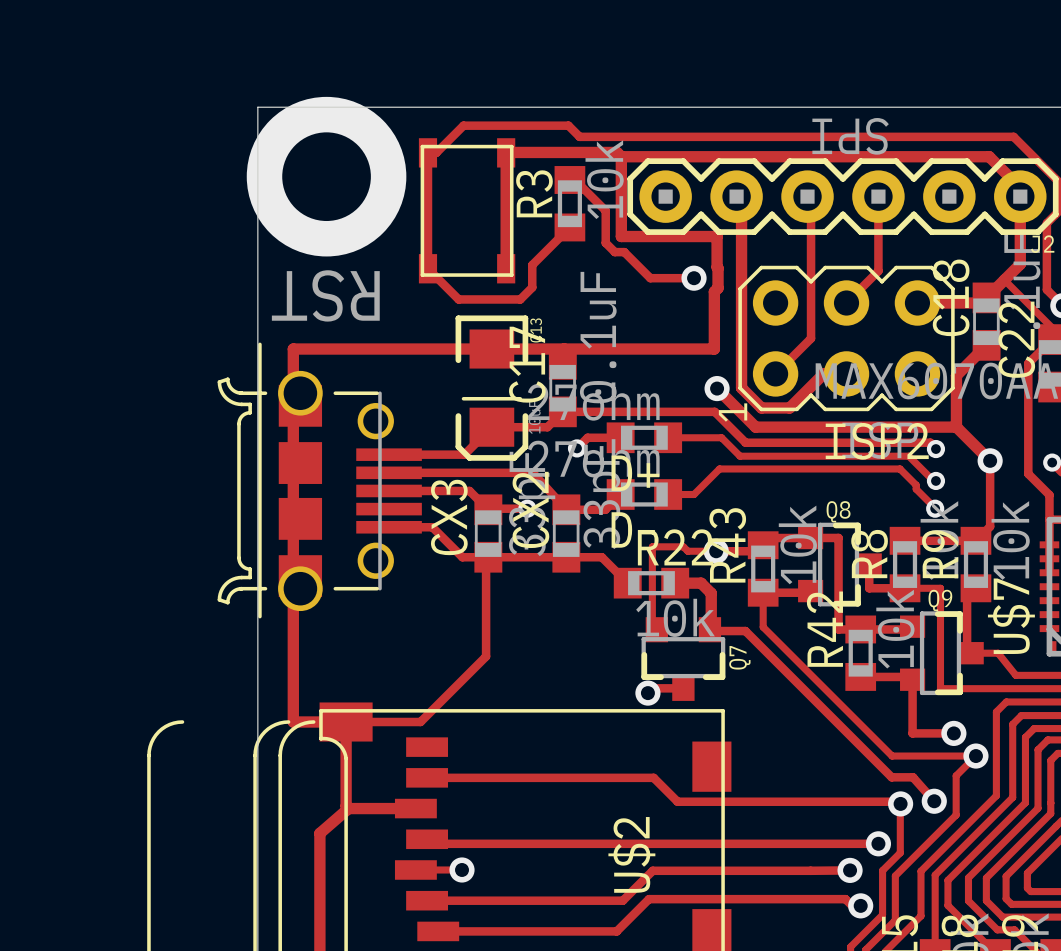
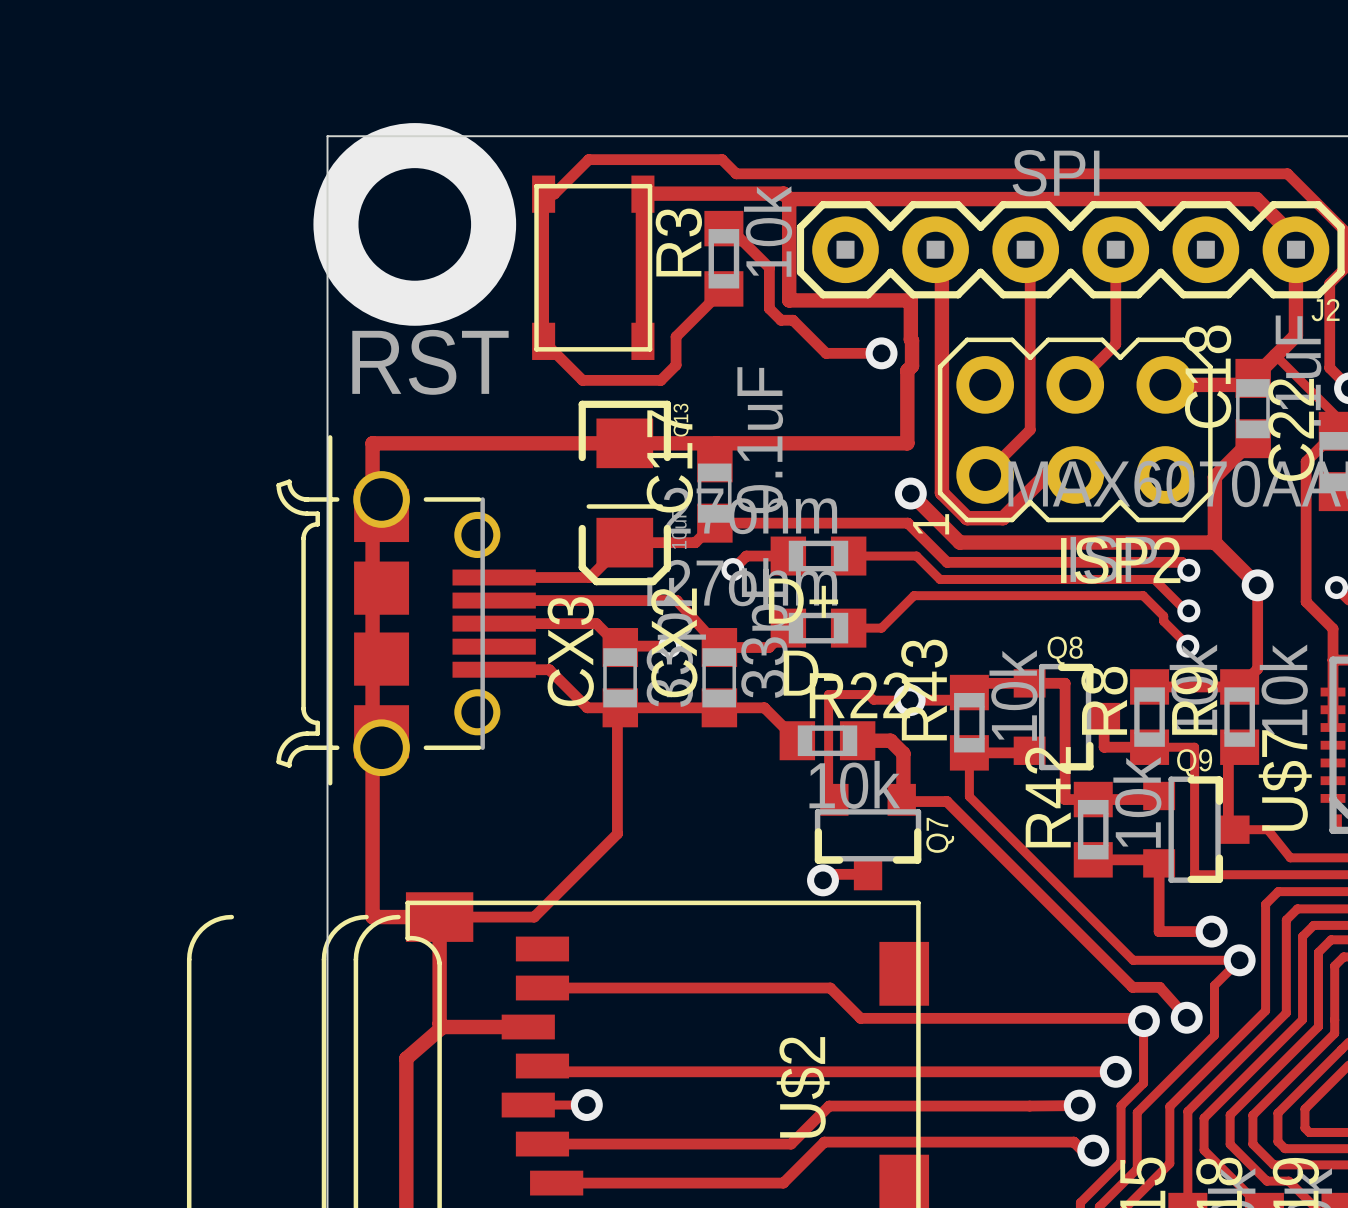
text rotation: 0° (850, 136) -> 180° (1056, 173)
text rotation: 0° (325, 295) -> 180° (430, 362)

